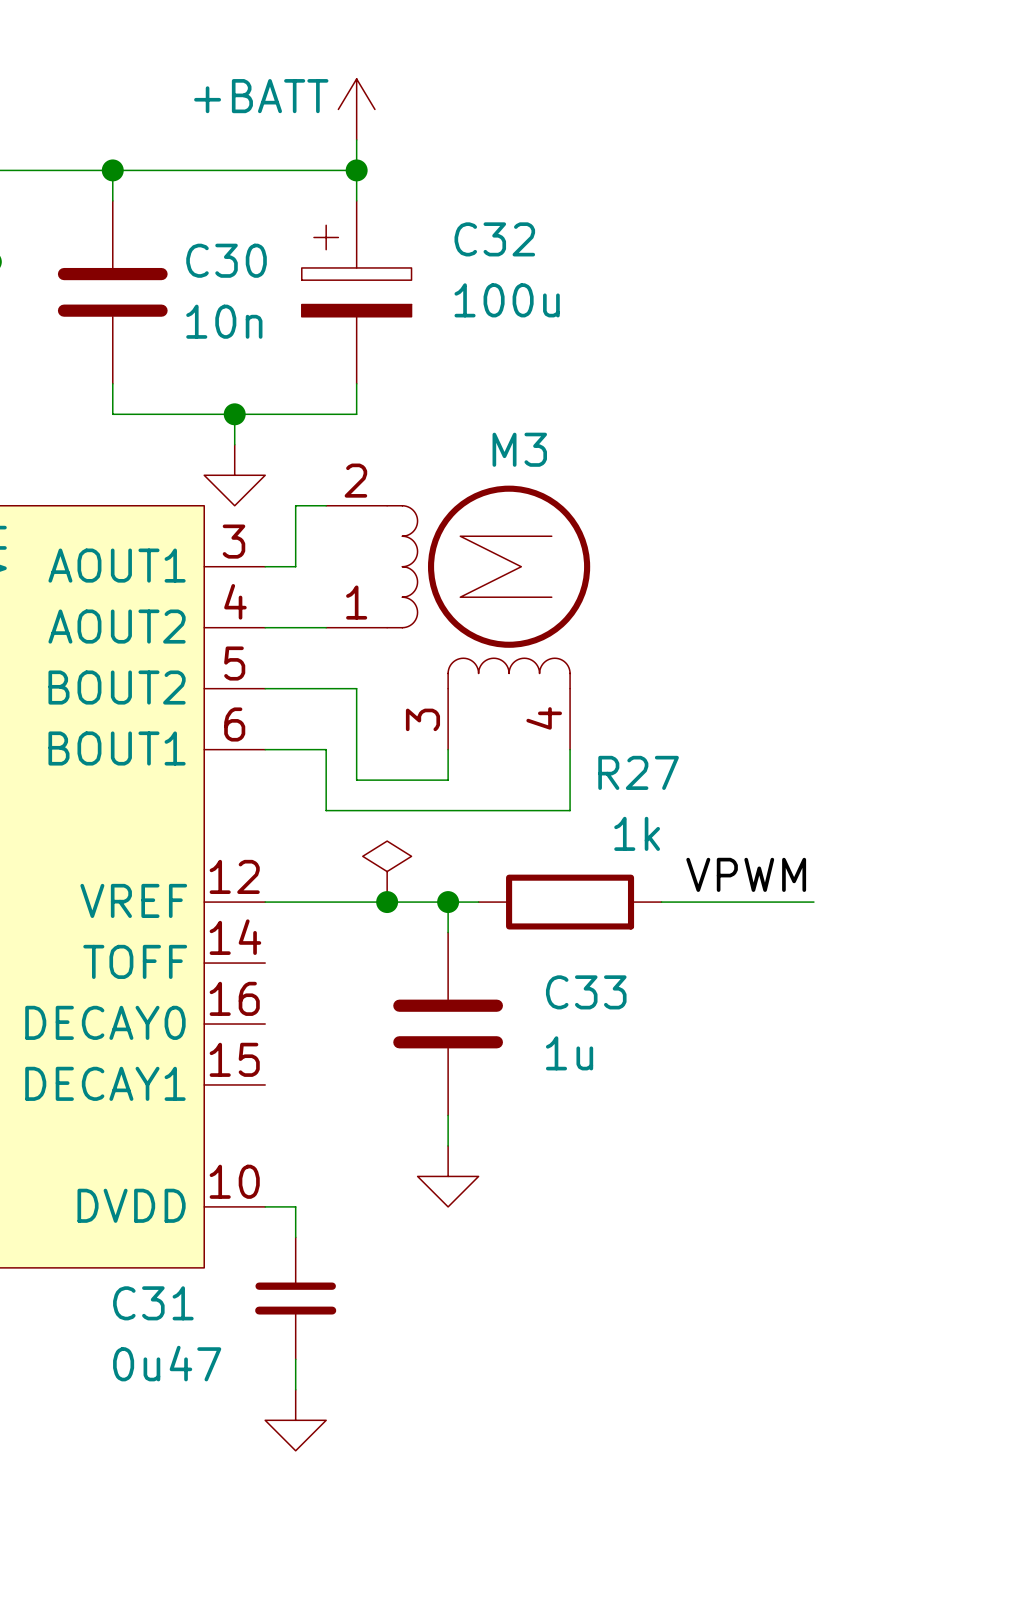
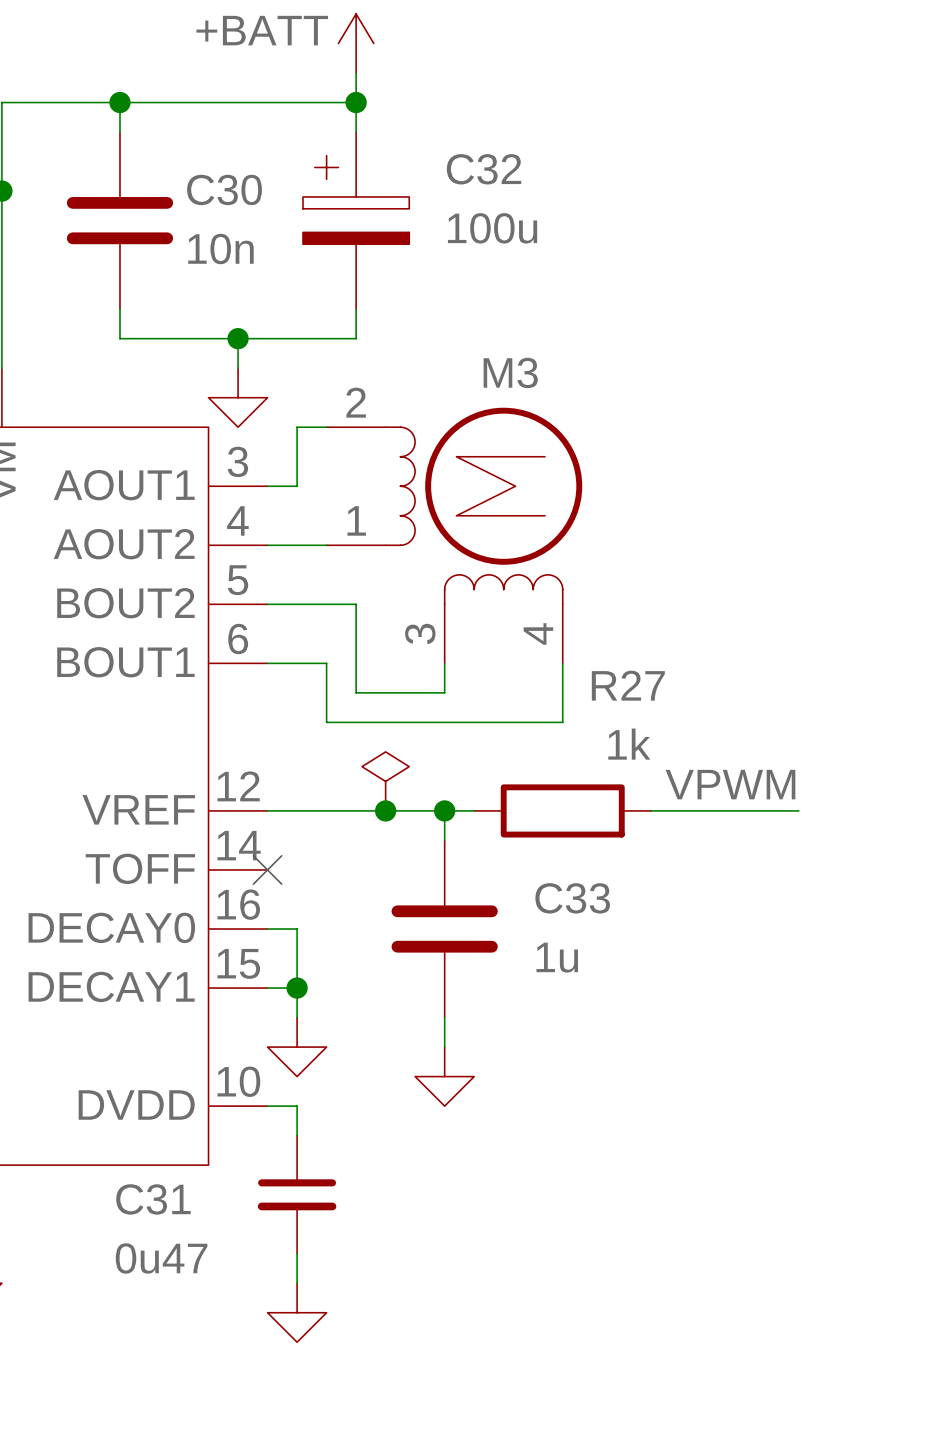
no-connect mark: none -> (267, 869)
wire: none -> (267, 929) (297, 929) (297, 1017)
wire: none -> (267, 988) (297, 988)
junction: none -> (297, 988)
power symbol: none -> (297, 1047)

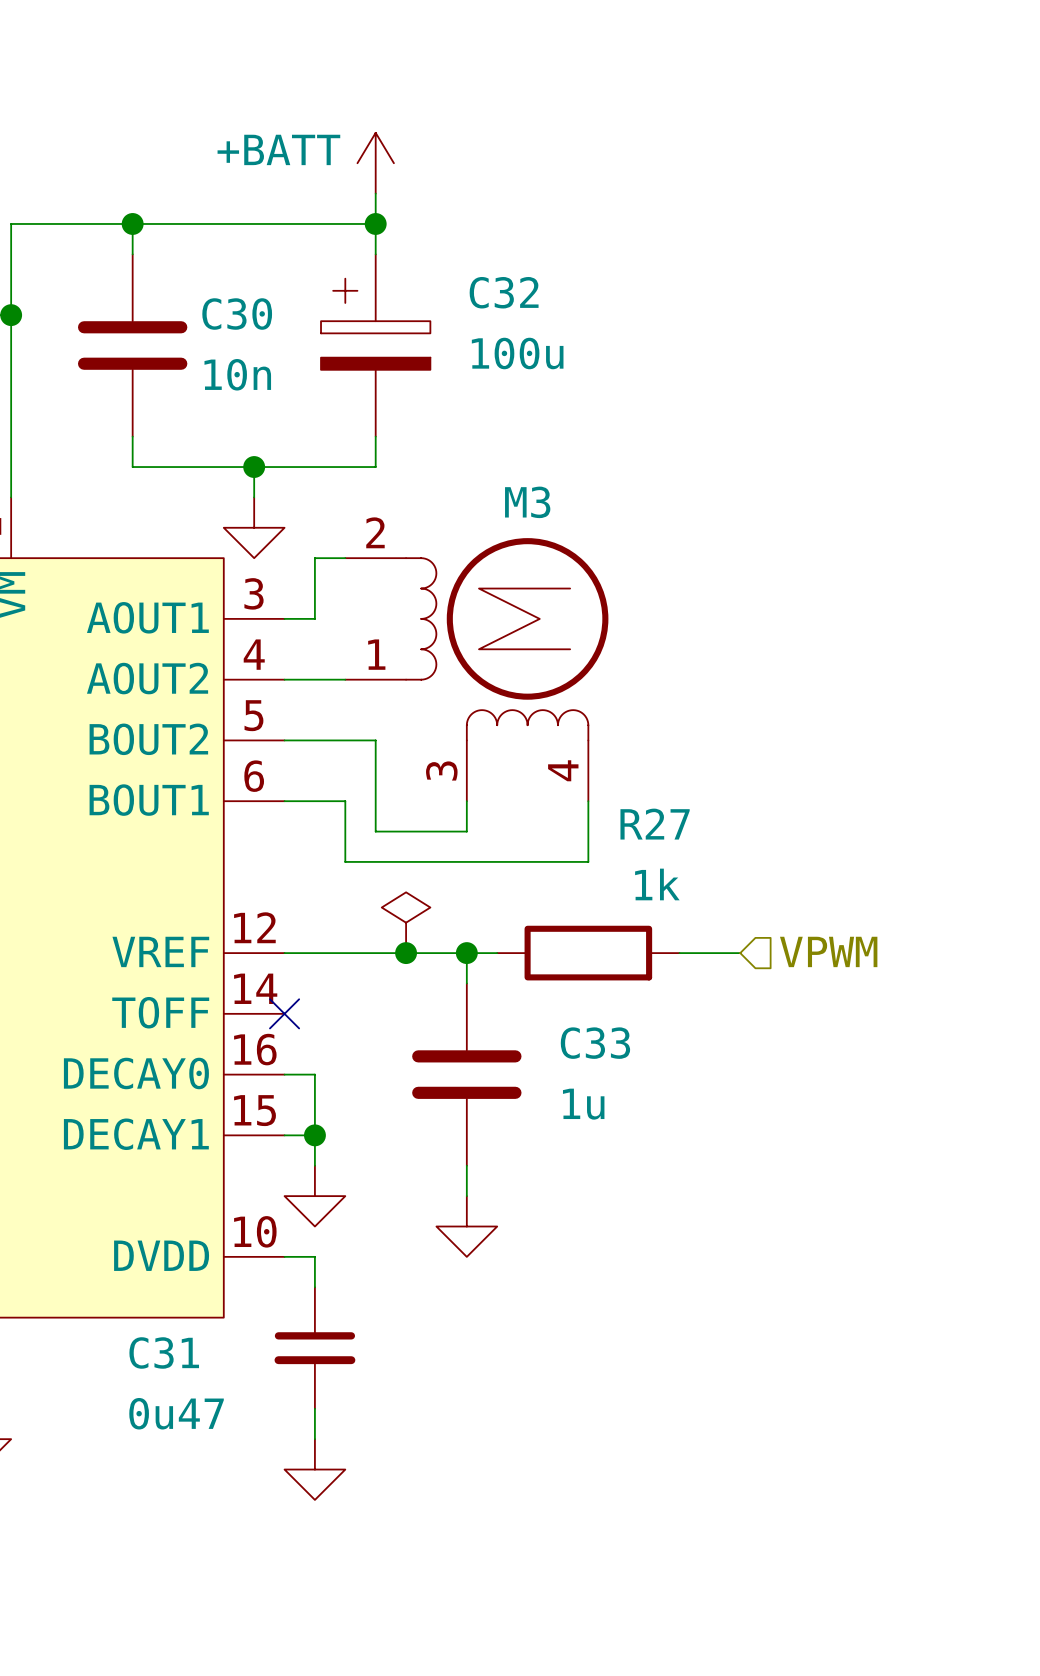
label: VPWM (730, 784) -> none
hierarchical label: none -> VPWM (828, 951)
wire: (710, 810) (798, 810) -> none

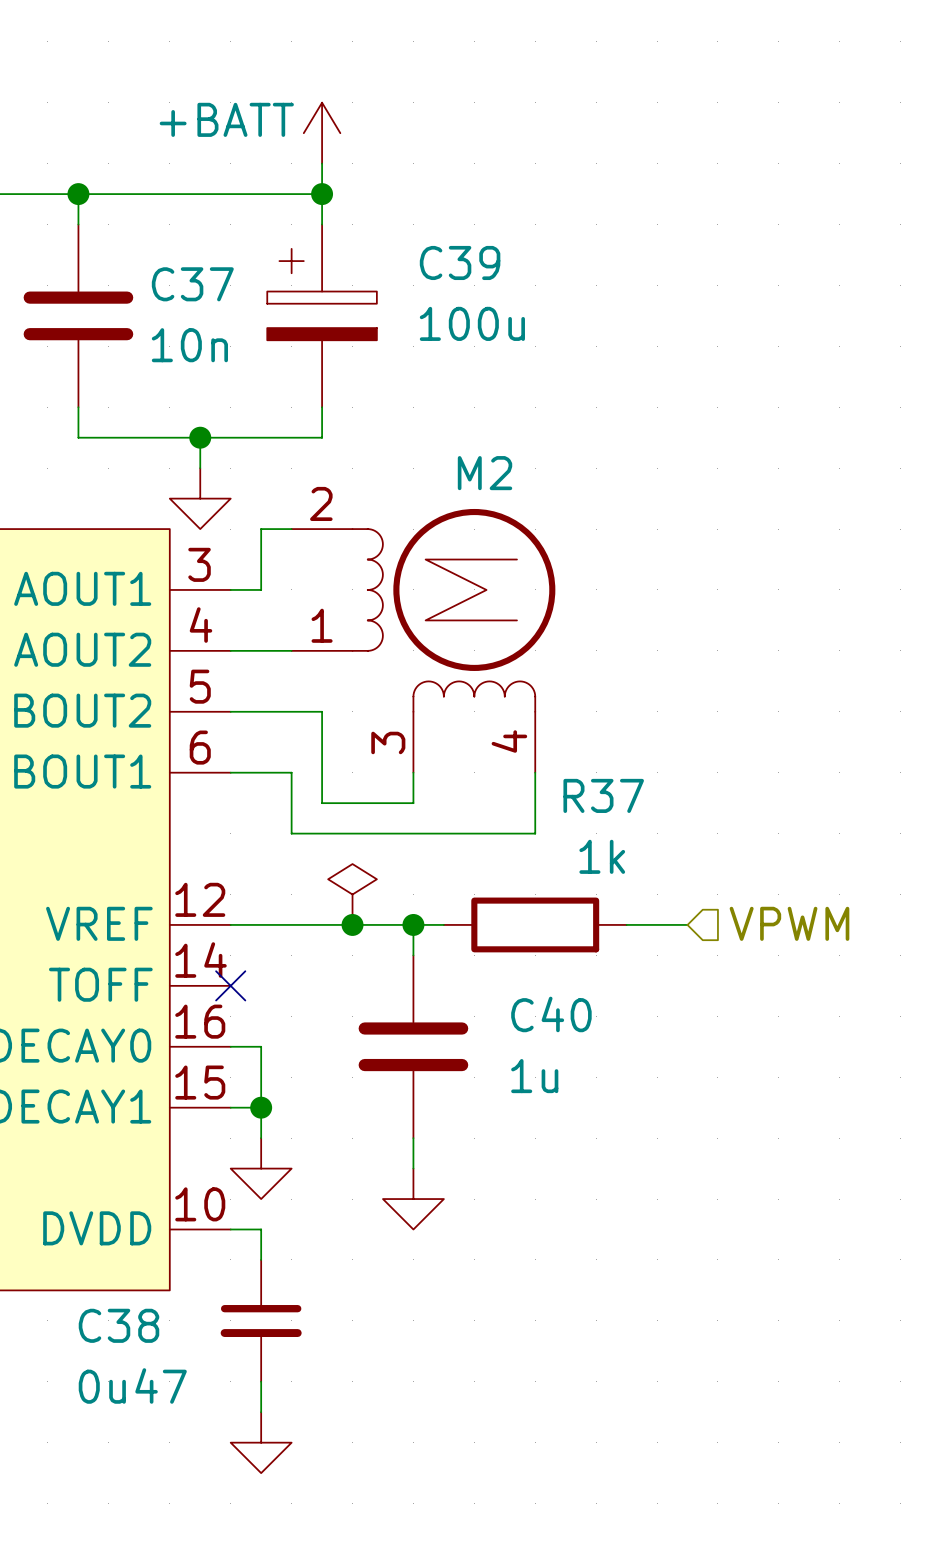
C32 name: C32 (504, 292) -> C39 (460, 262)
C30 name: C30 (237, 314) -> C37 (192, 284)
M3 name: M3 (527, 502) -> M2 (485, 473)
R27 name: R27 (655, 824) -> R37 (603, 795)
C33 name: C33 (595, 1043) -> C40 (551, 1014)
C31 name: C31 (164, 1352) -> C38 (118, 1325)

